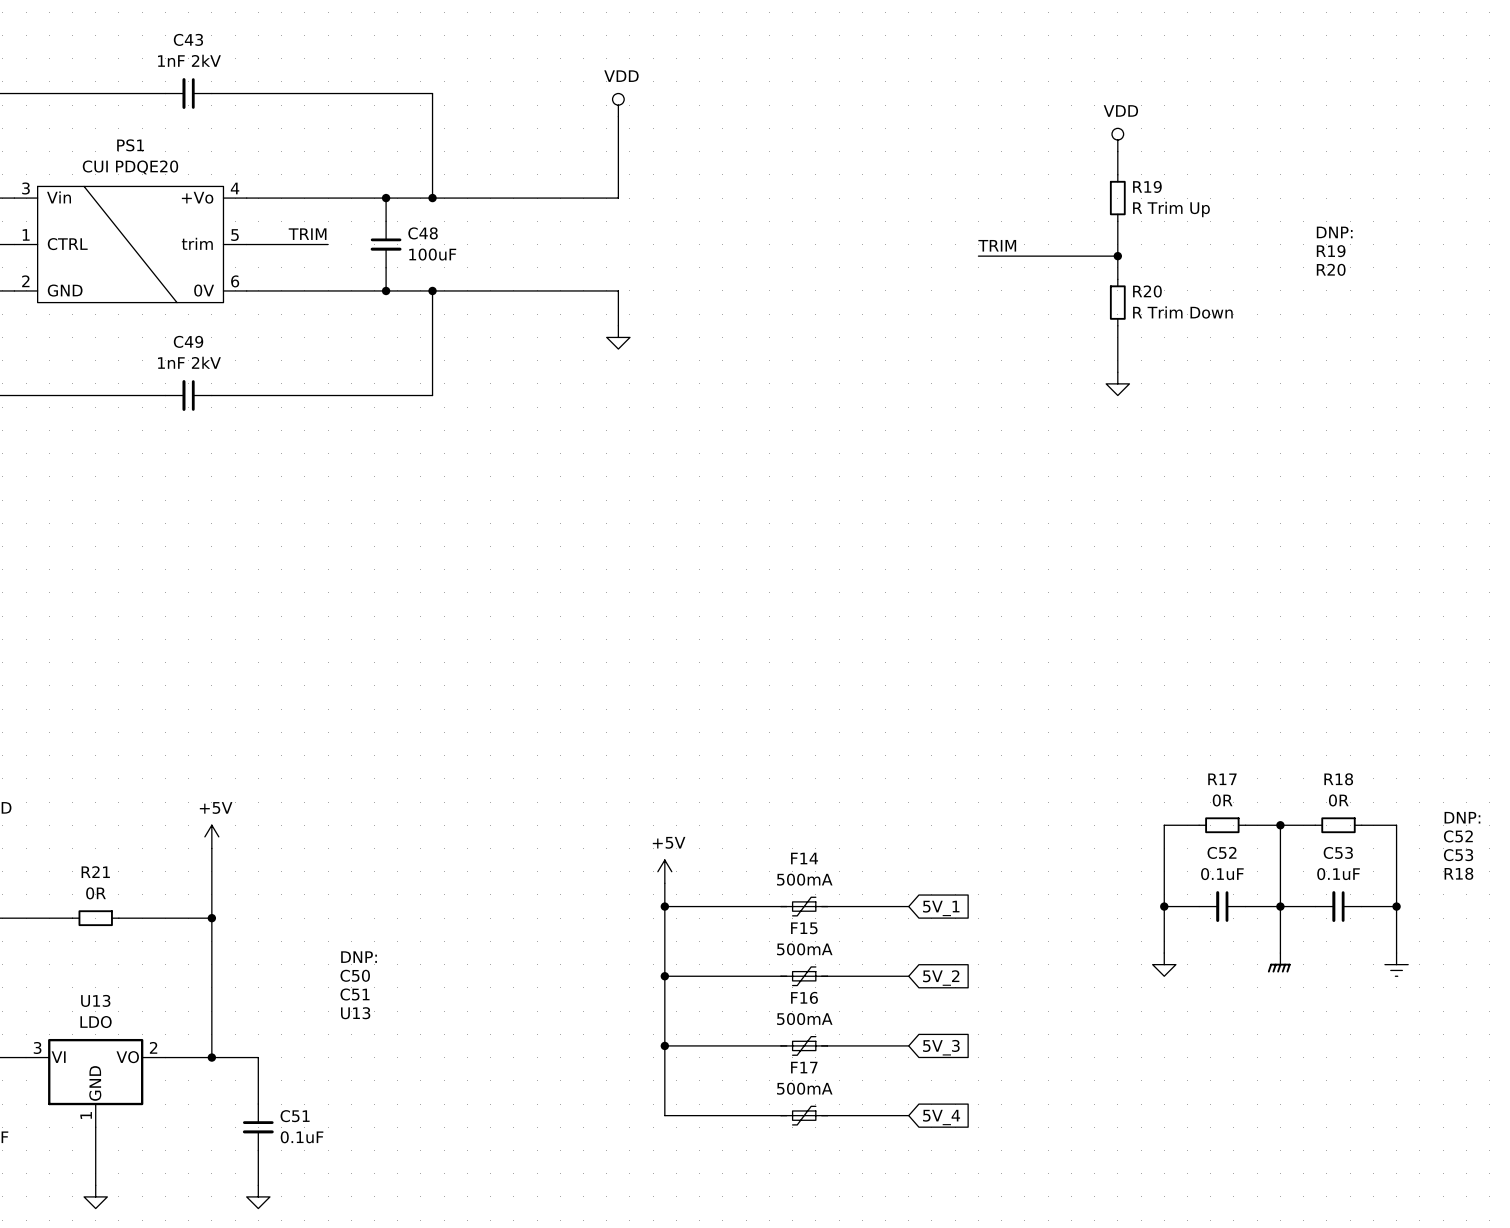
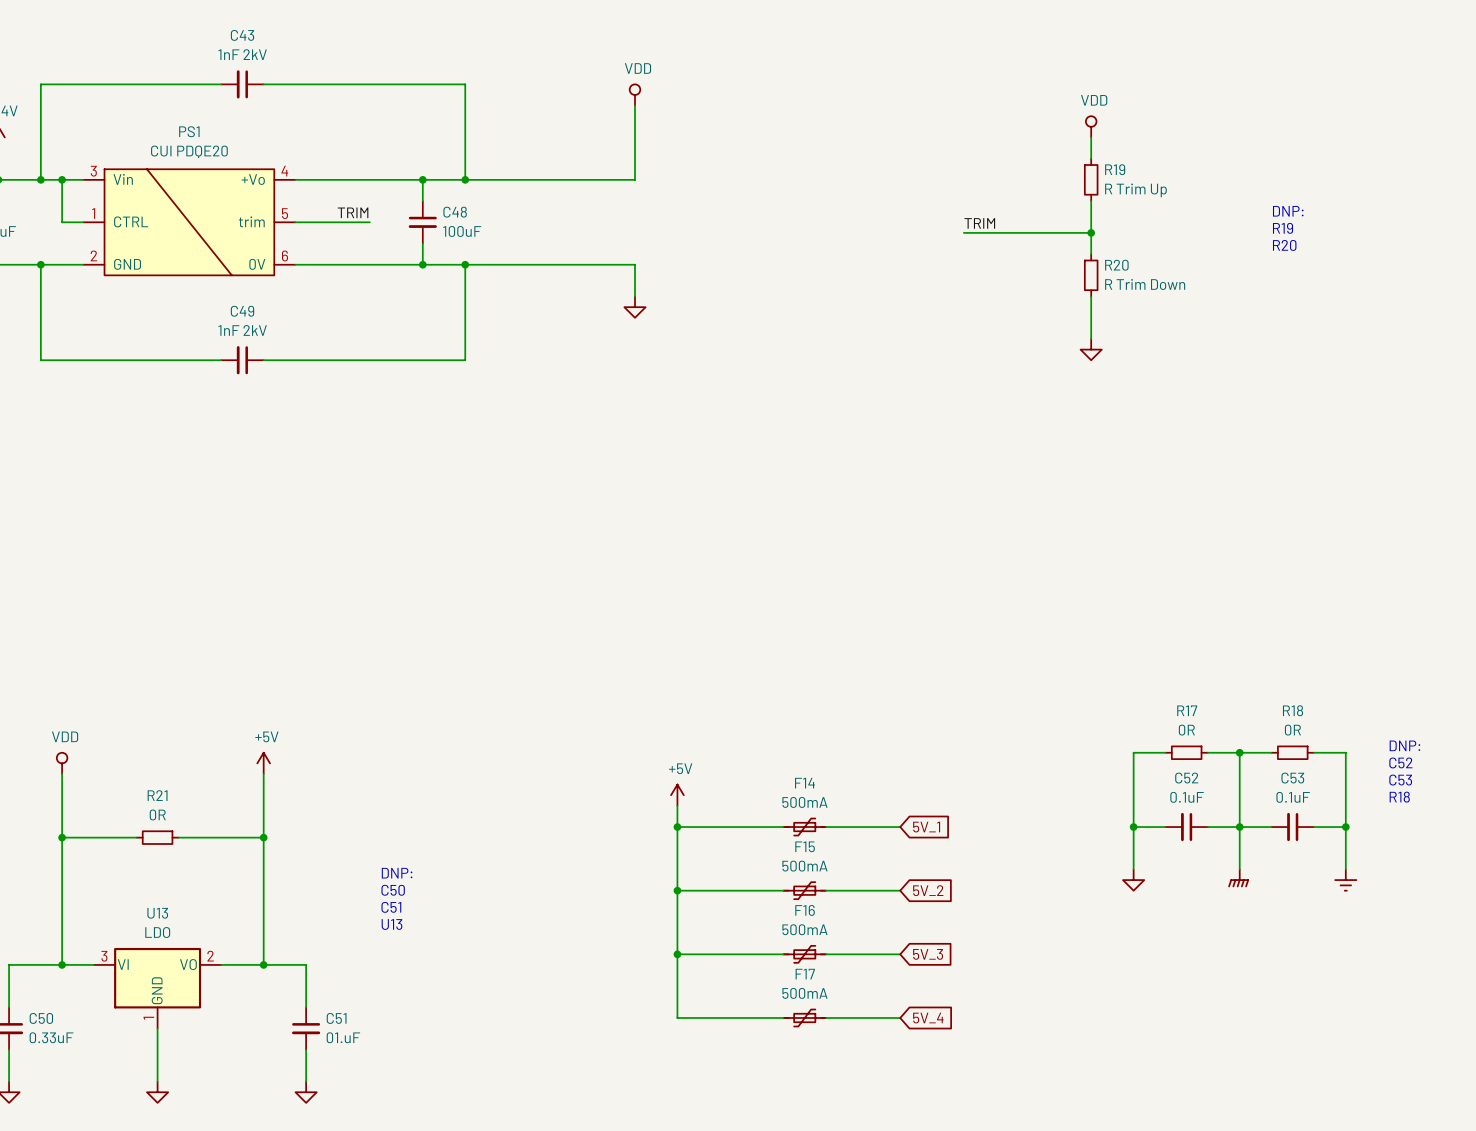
C51 value: 0.1uF (302, 1137) -> 01.uF (343, 1037)

